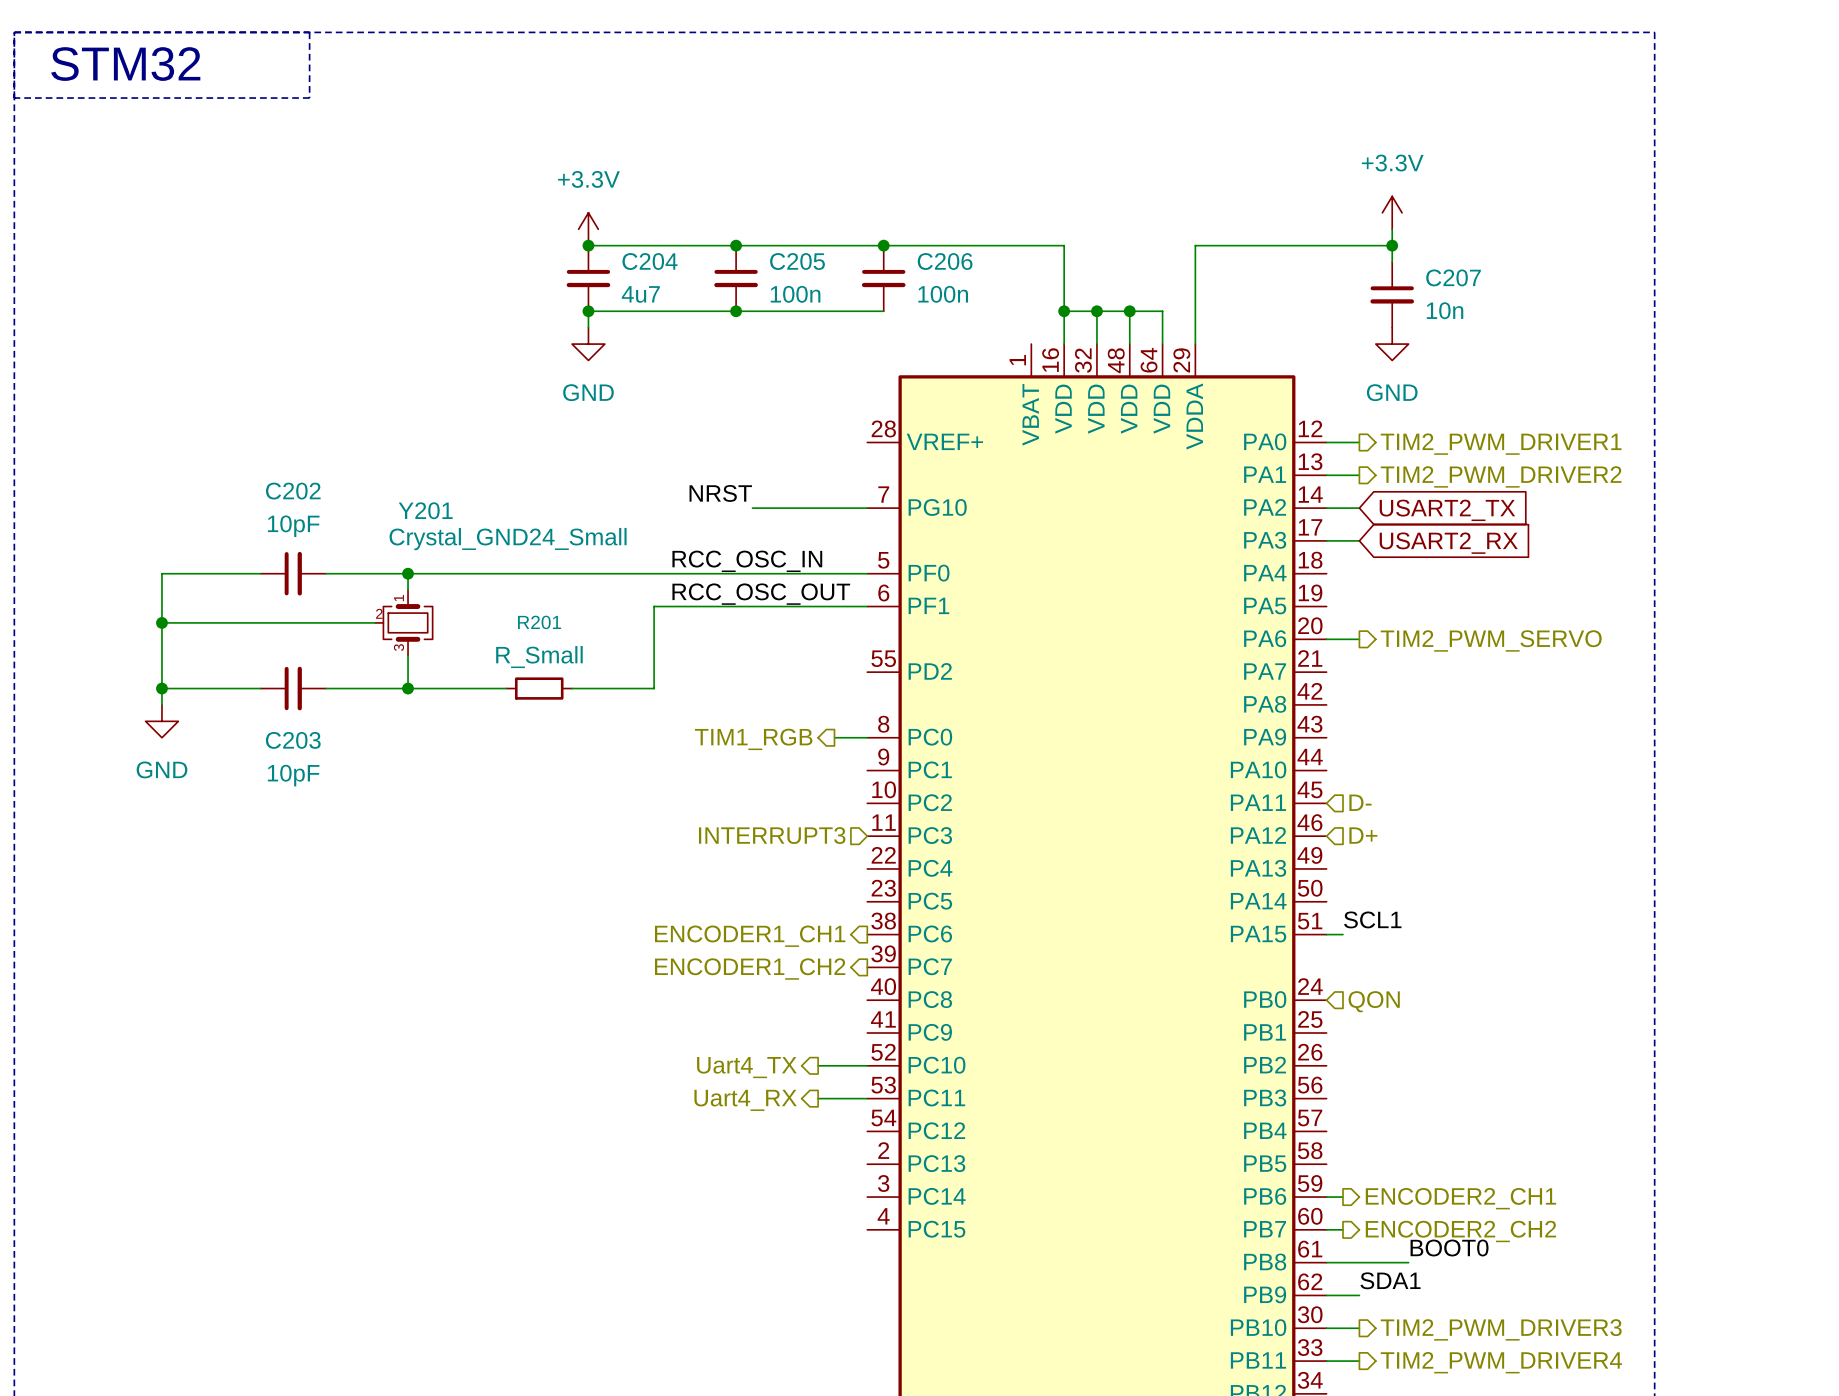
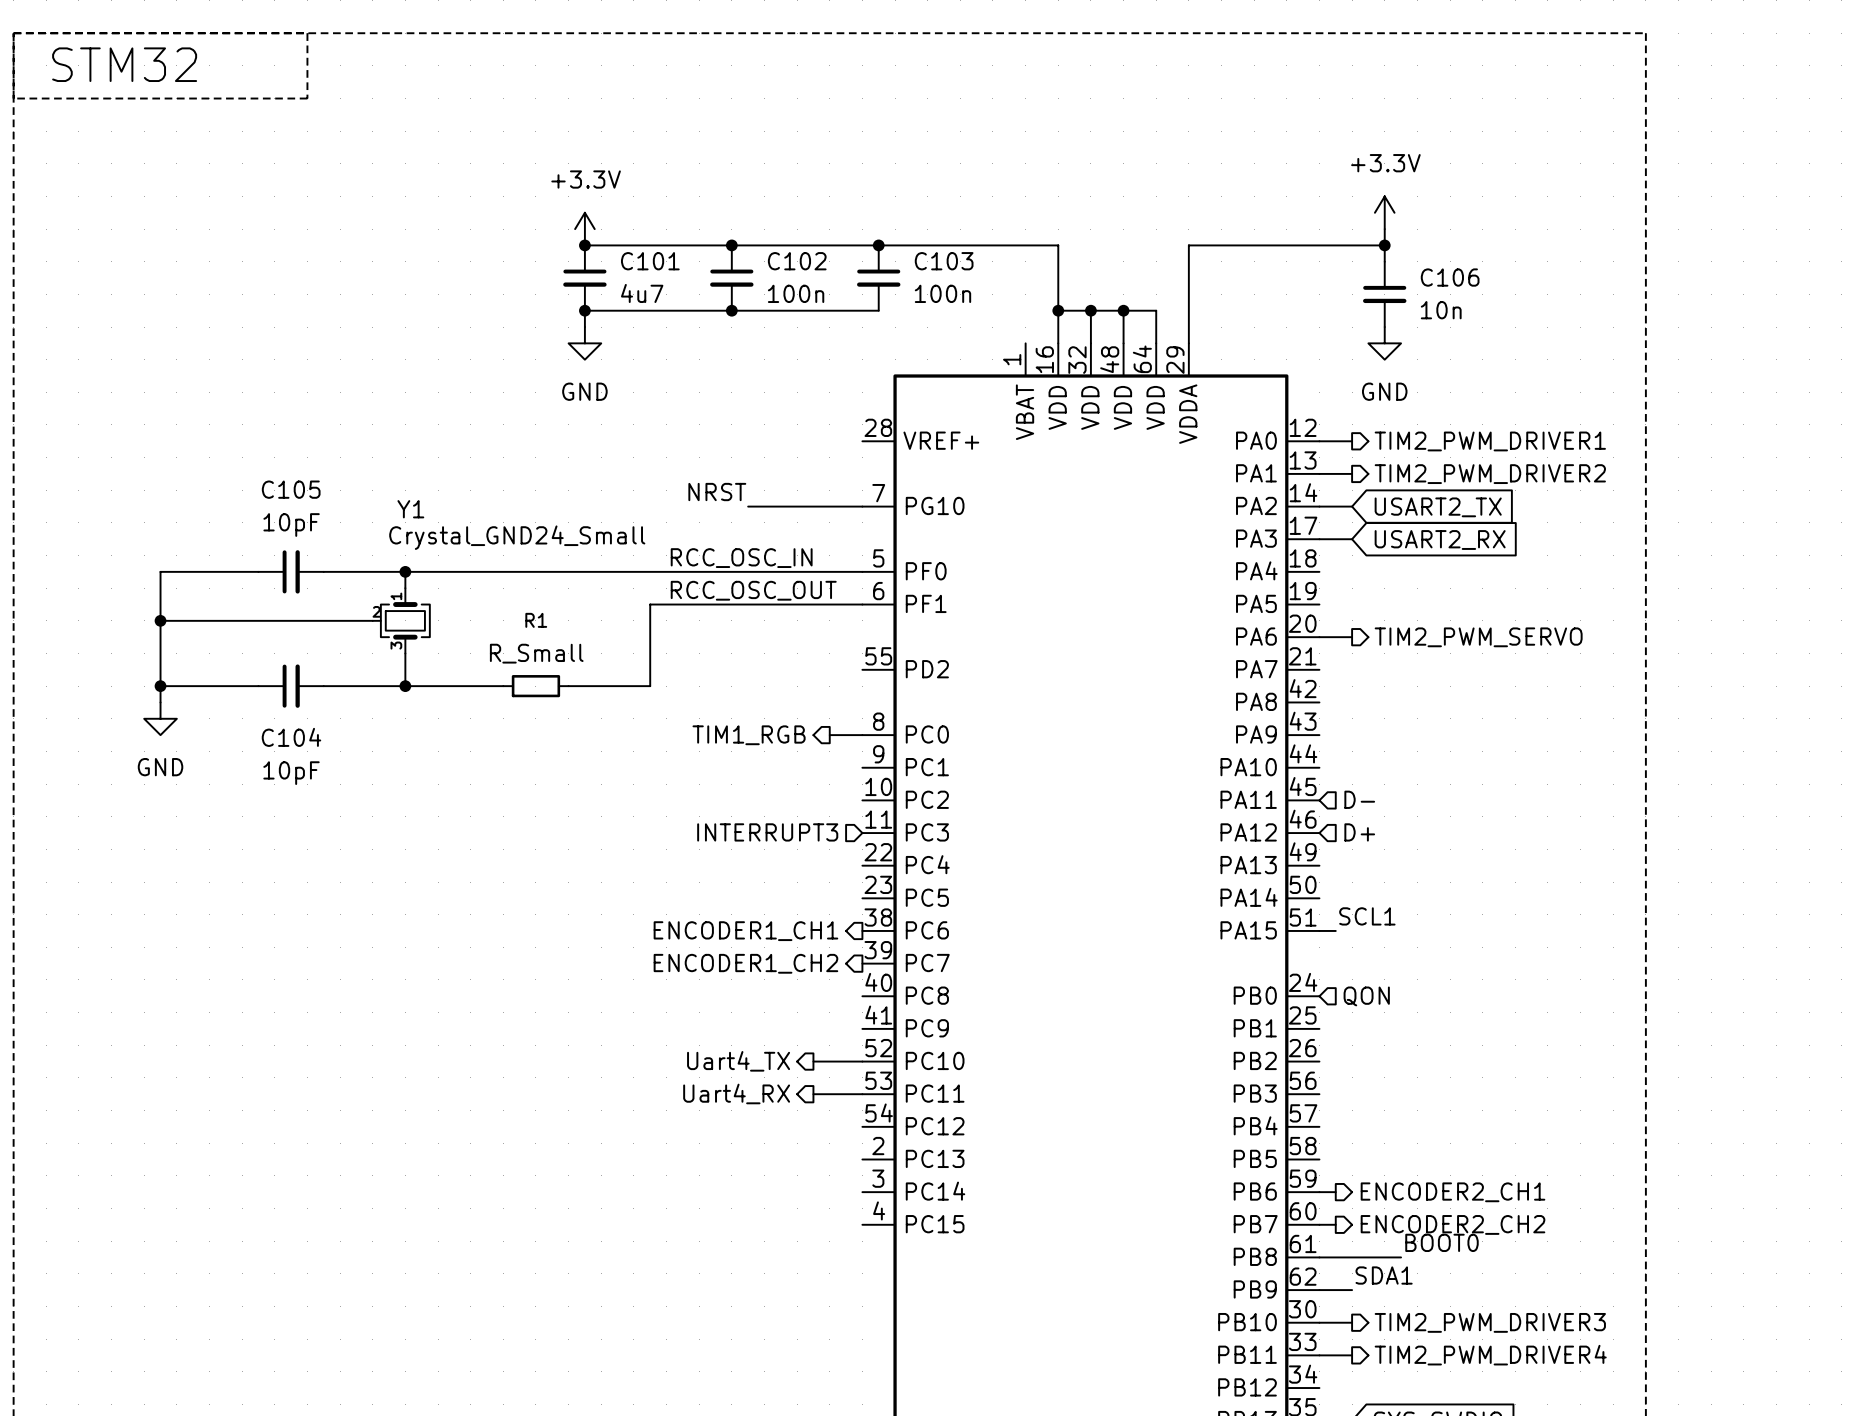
C204 name: C204 (650, 261) -> C101 (650, 261)
C205 name: C205 (797, 261) -> C102 (797, 261)
C206 name: C206 (945, 261) -> C103 (944, 261)
C207 name: C207 (1453, 277) -> C106 (1450, 277)
C202 name: C202 (293, 491) -> C105 (291, 489)
Y201 name: Y201 (425, 510) -> Y1 (410, 509)
R201 name: R201 (539, 622) -> R1 (536, 620)
C203 name: C203 (293, 740) -> C104 (291, 737)

